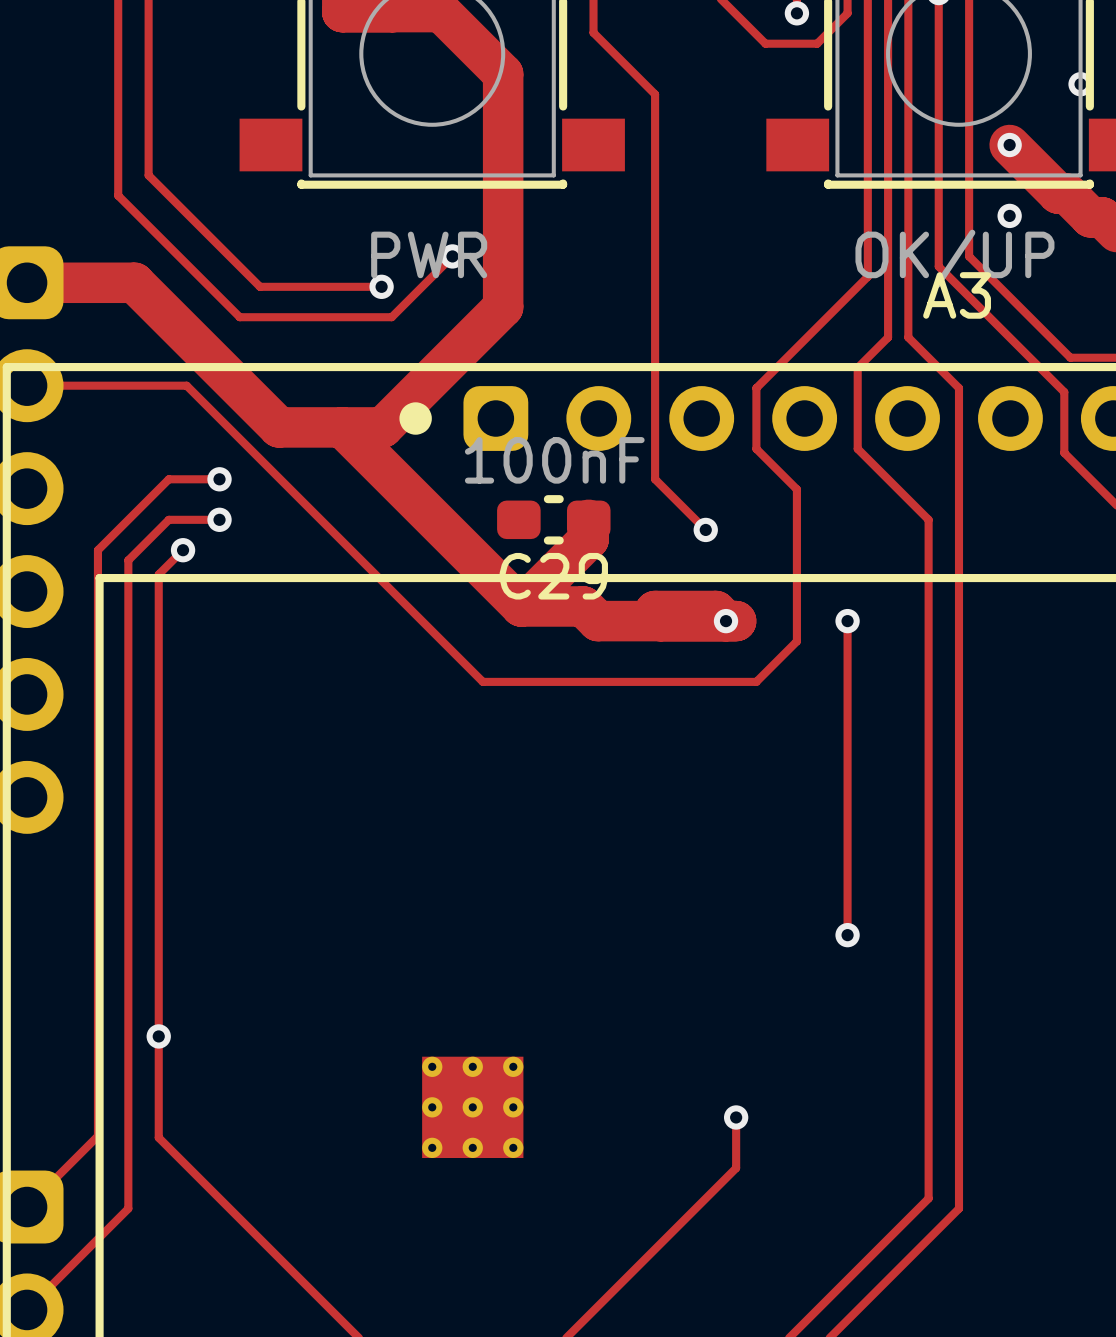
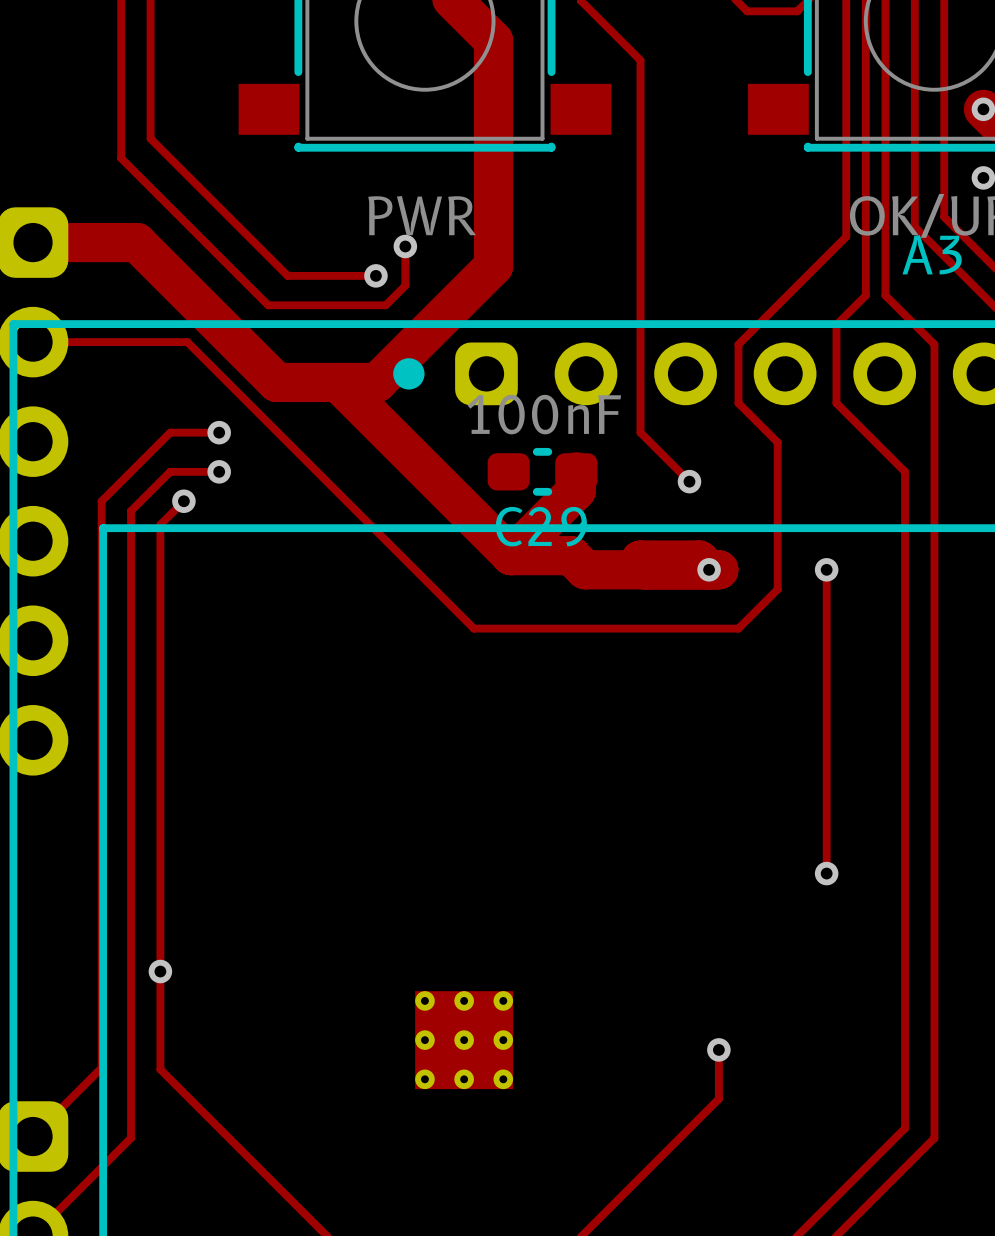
track: (452, 256) (391, 317) (381, 317) -> none
via: (452, 256) -> none
track: (260, 286) (381, 286) -> none
via: (381, 286) -> none
track: none -> (405, 246) (405, 285) (385, 305) (268, 305) (238, 275)
via: none -> (405, 246)
track: (239, 317) (290, 317) -> (258, 246) (287, 275)
via: none -> (375, 275)

